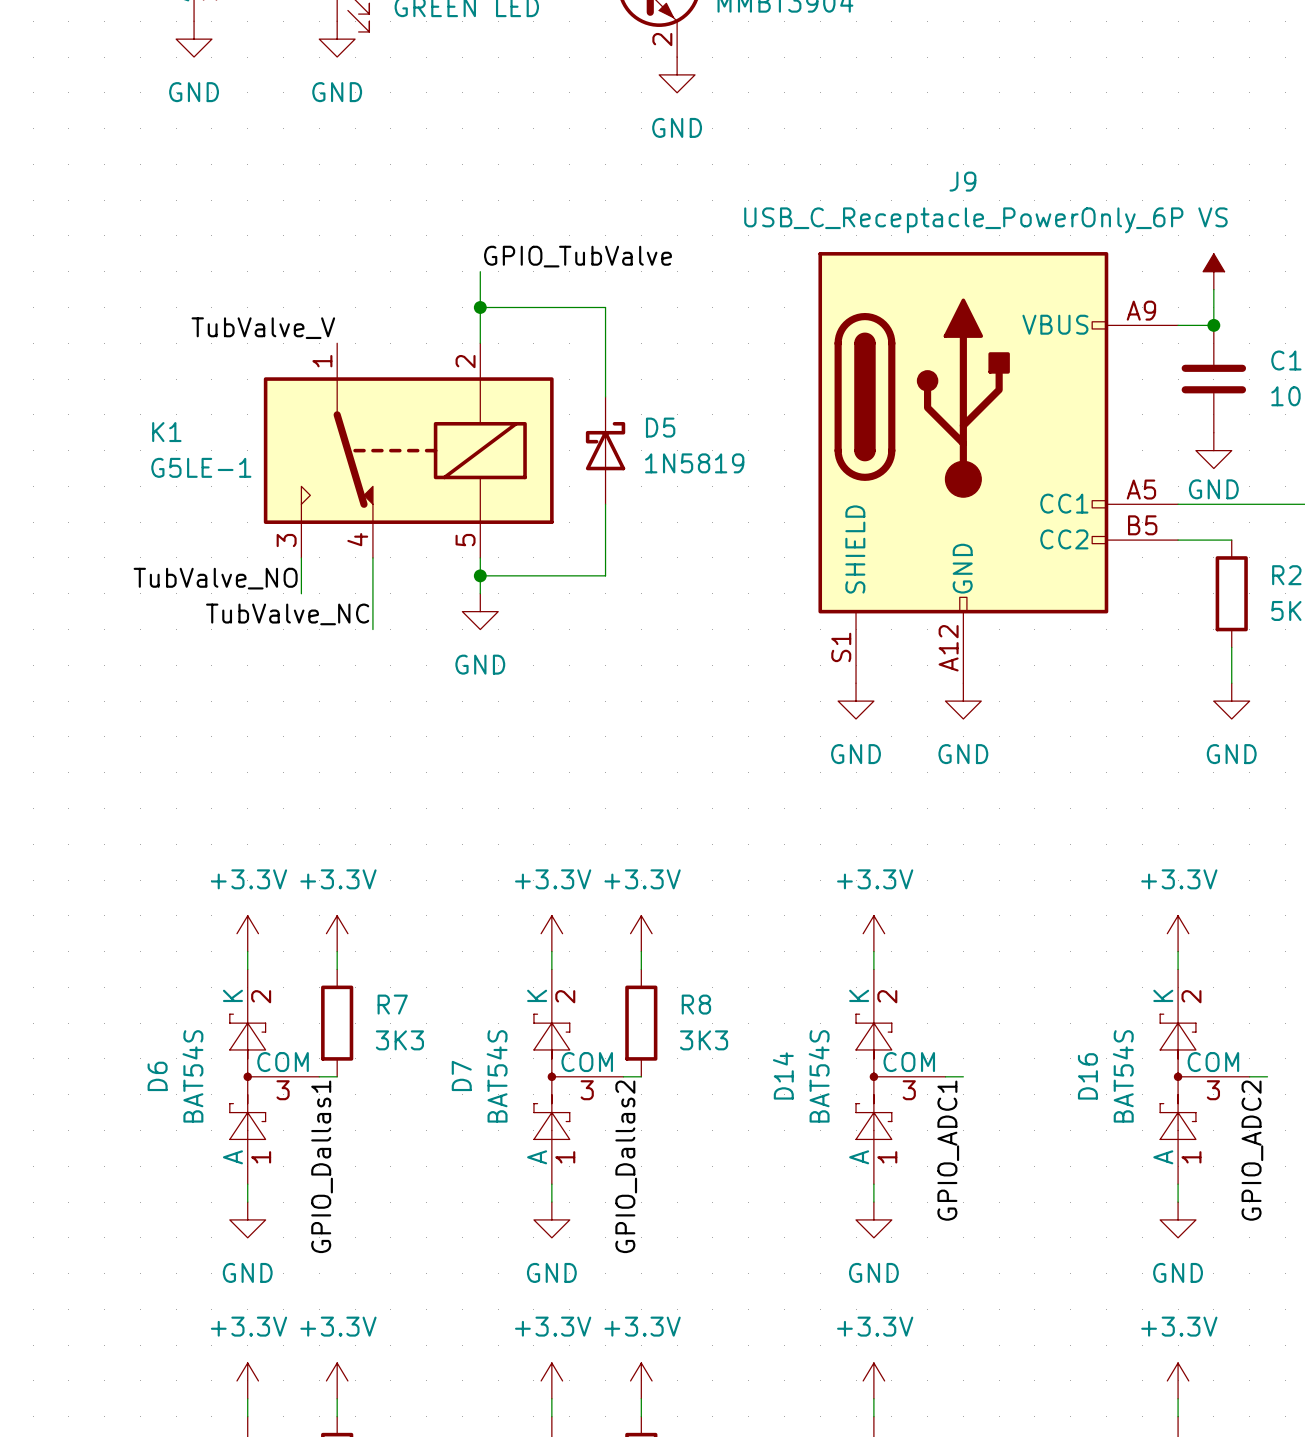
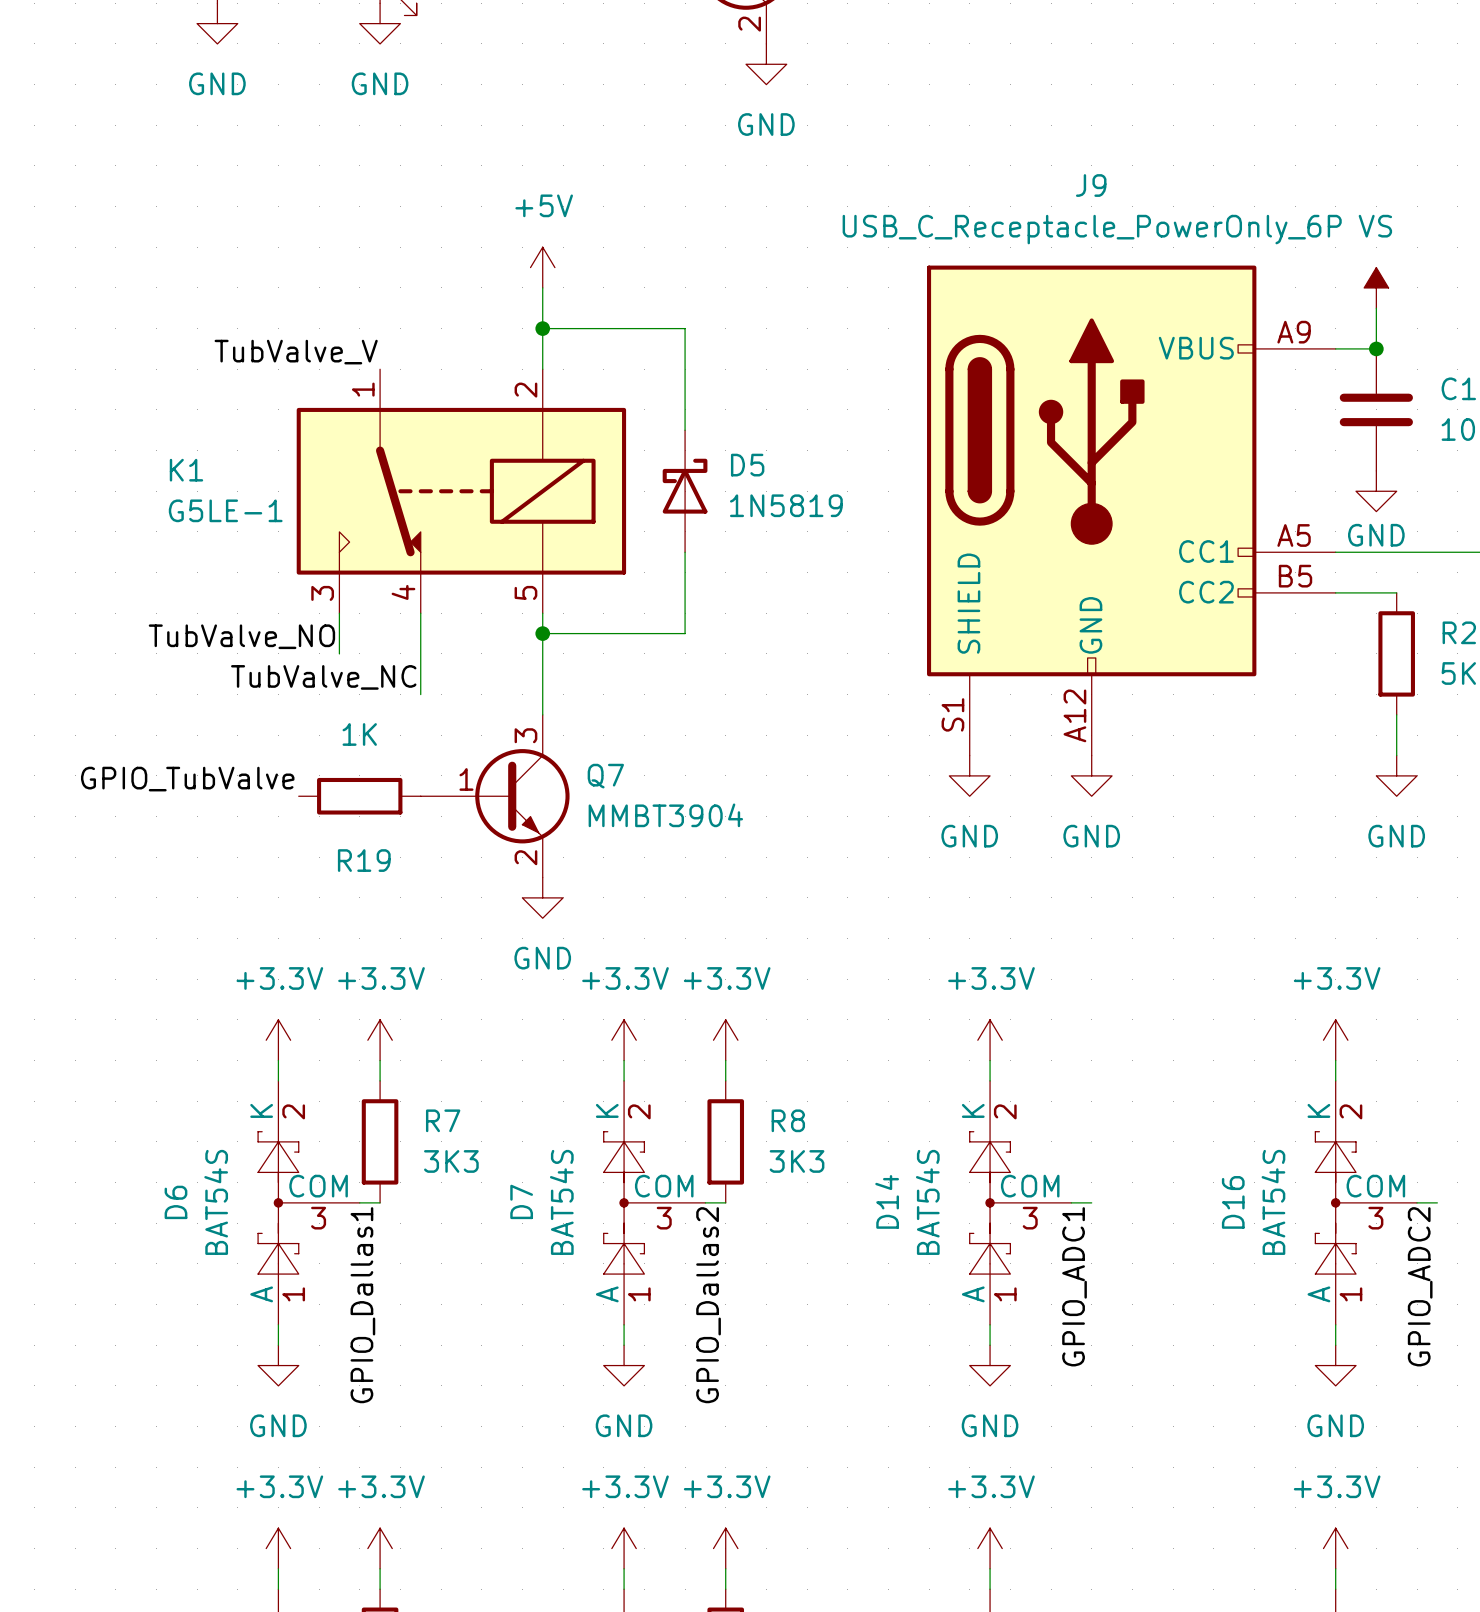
power symbol: none -> +5V (542, 267)
label: GPIO_TubValve (577, 256) -> none
wire: none -> (542, 653) (542, 714)
power symbol position: GND (480, 611) -> GND (542, 897)
label: none -> GPIO_TubValve (187, 779)
R19: none -> 1K (359, 796)
Q7: none -> MMBT3904 (495, 796)

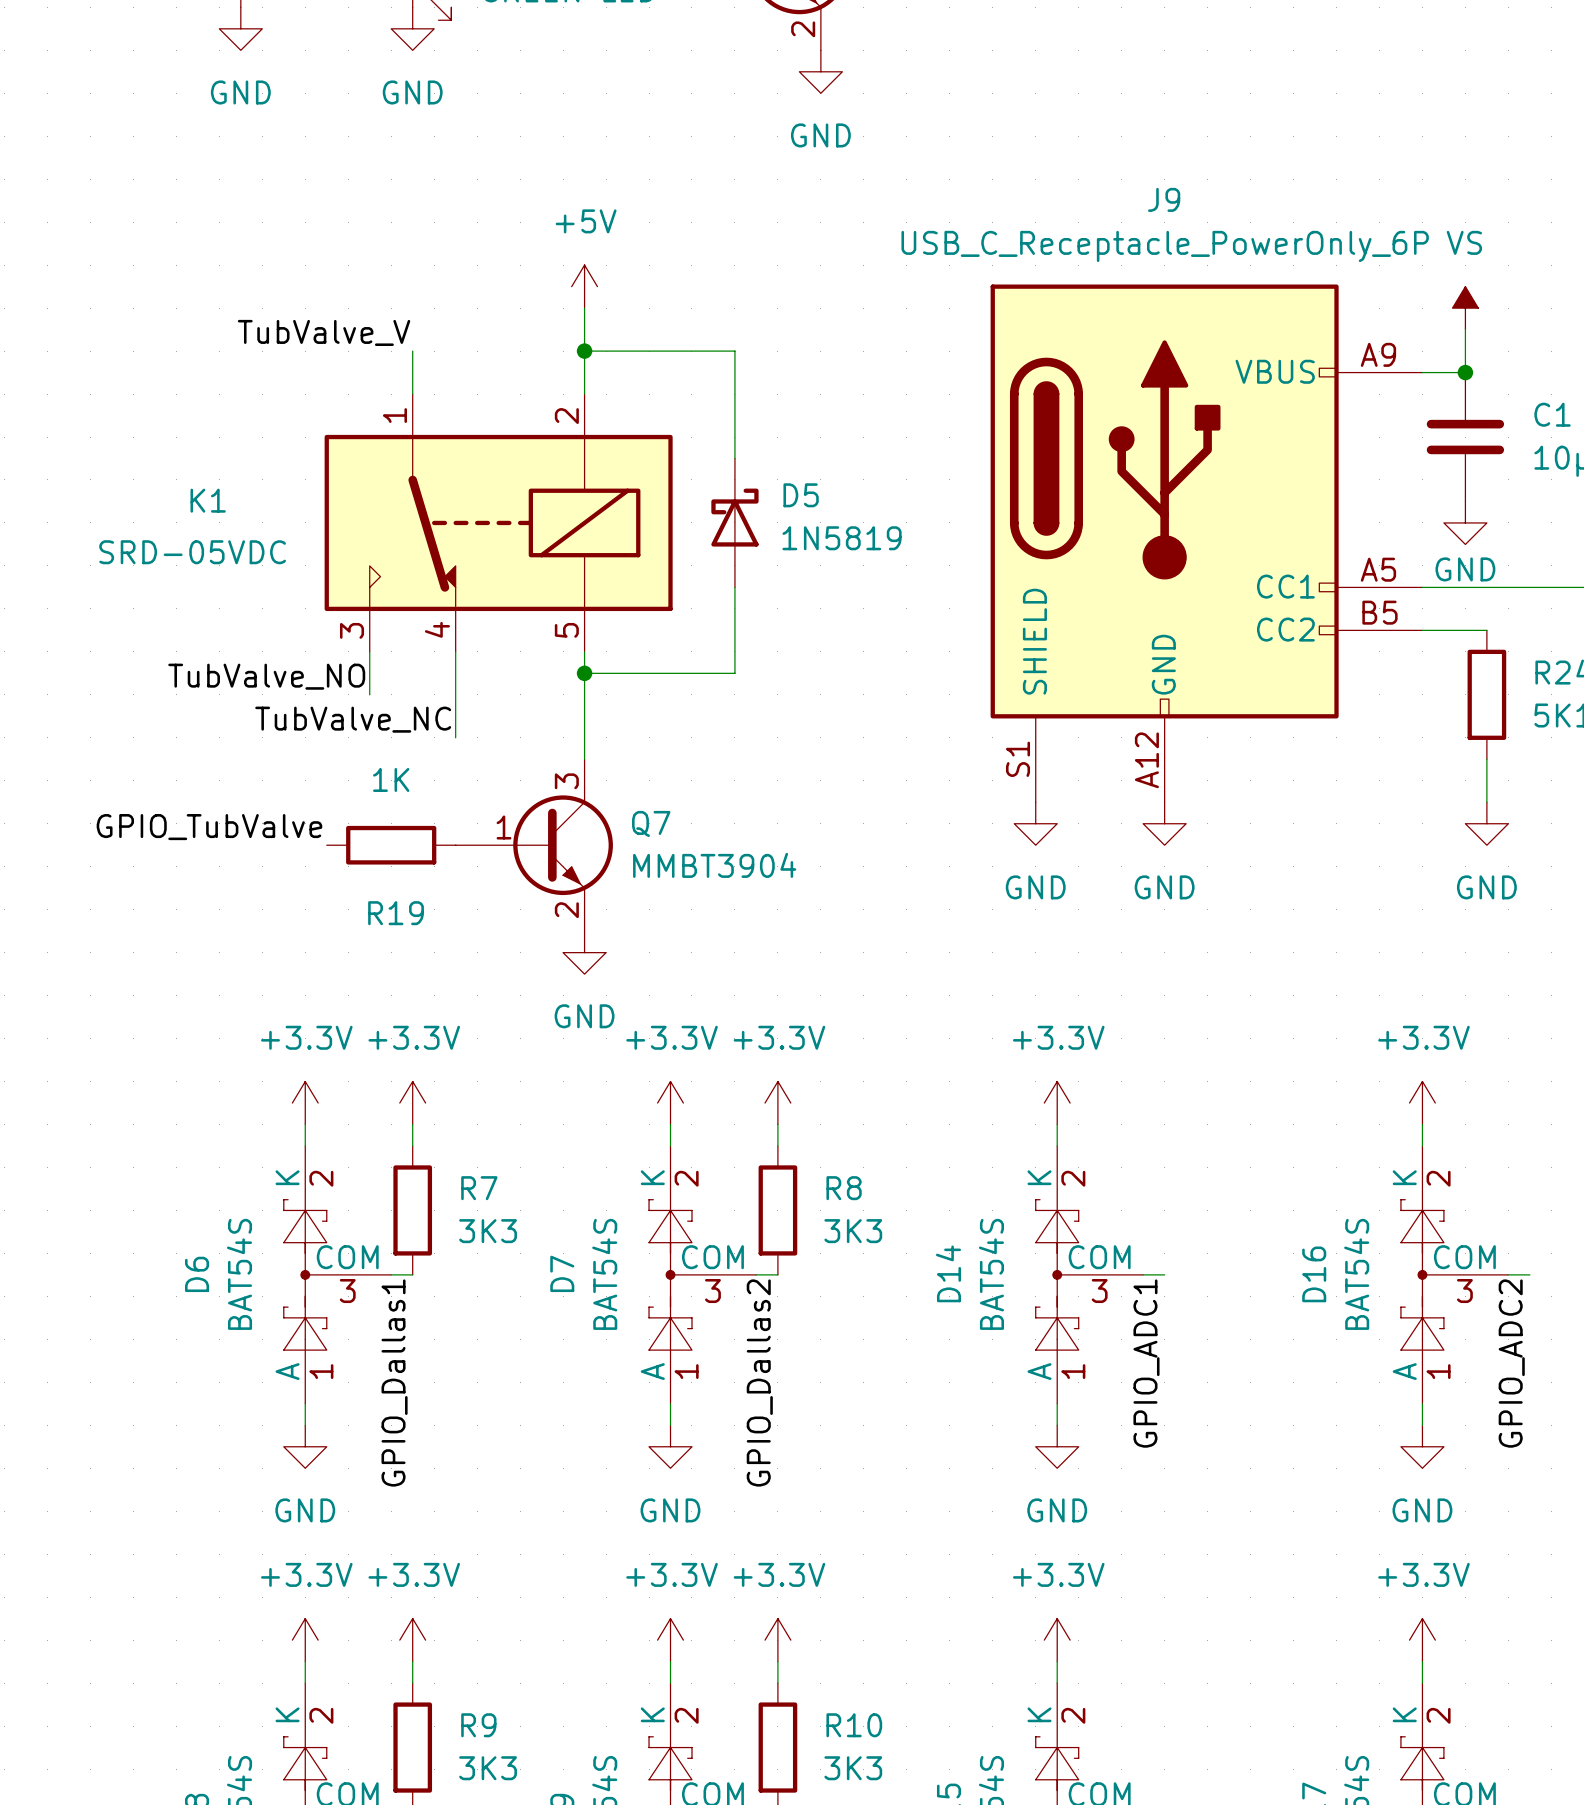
wire: none -> (412, 351) (412, 394)
label position: TubValve_V (296, 352) -> TubValve_V (324, 332)
K1 value: G5LE-1 (225, 510) -> SRD-05VDC (192, 552)

